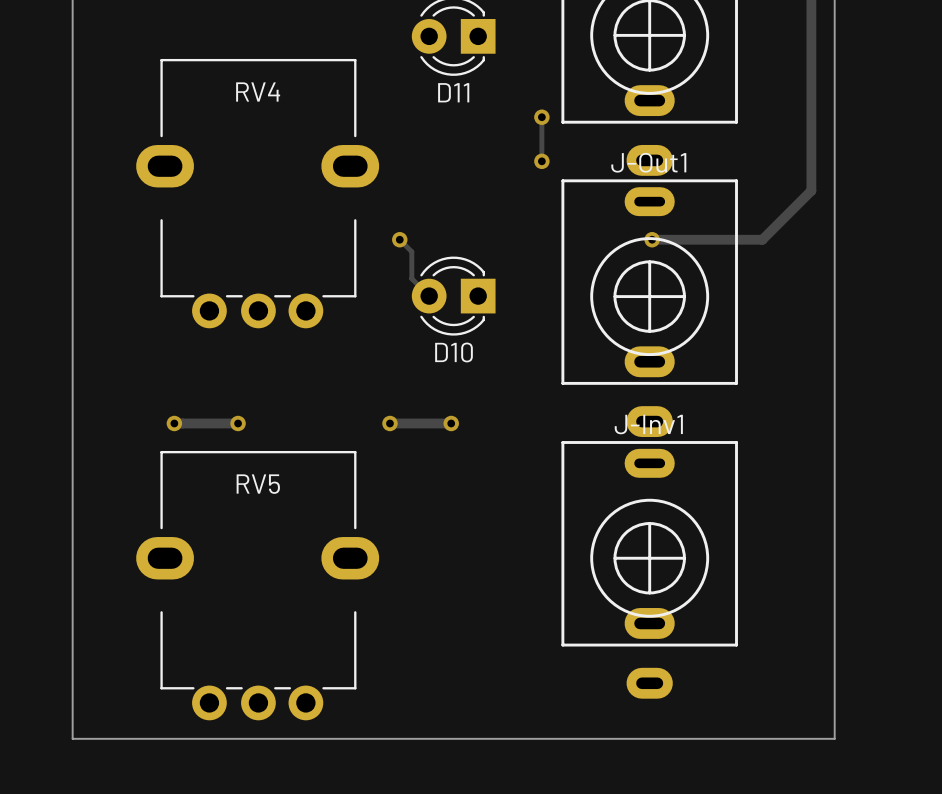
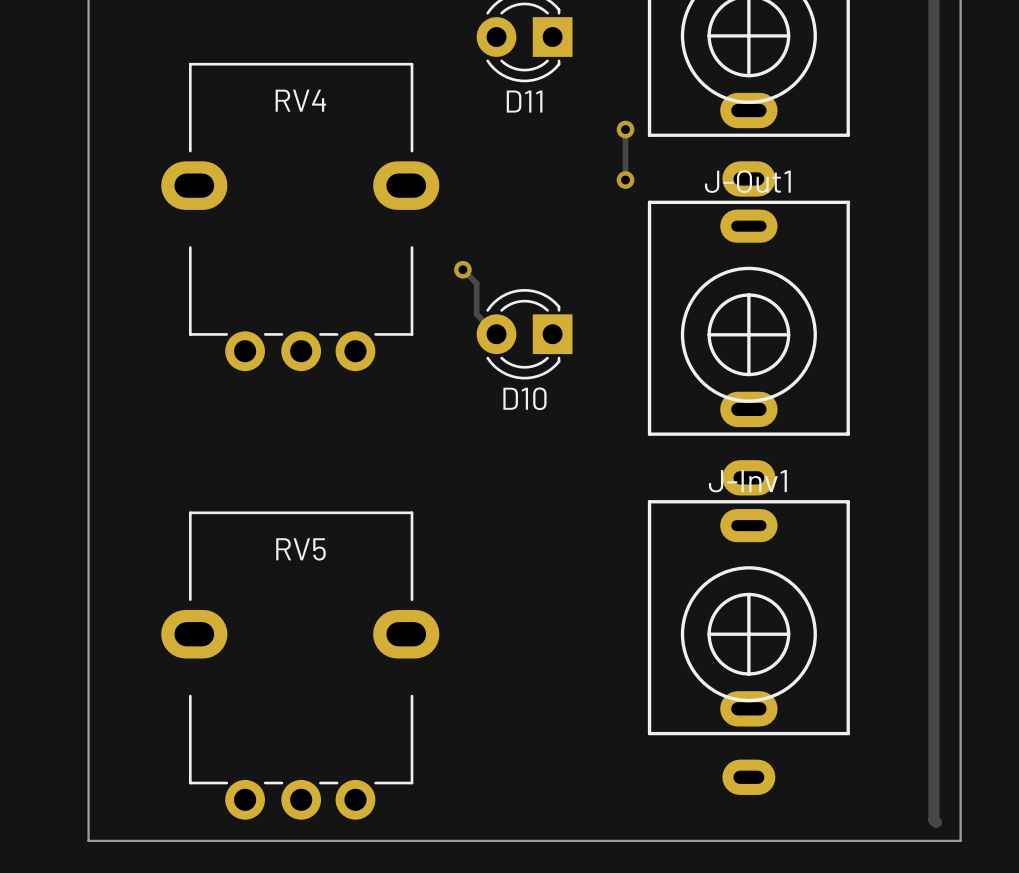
track: (811, 190) (762, 239) (652, 239) -> (933, 213) (933, 819) (936, 822)
via: (652, 239) -> none
track: (174, 423) (238, 423) -> none
via: (174, 423) -> none
via: (238, 423) -> none
track: (389, 423) (451, 423) -> none
via: (389, 423) -> none
via: (451, 423) -> none

